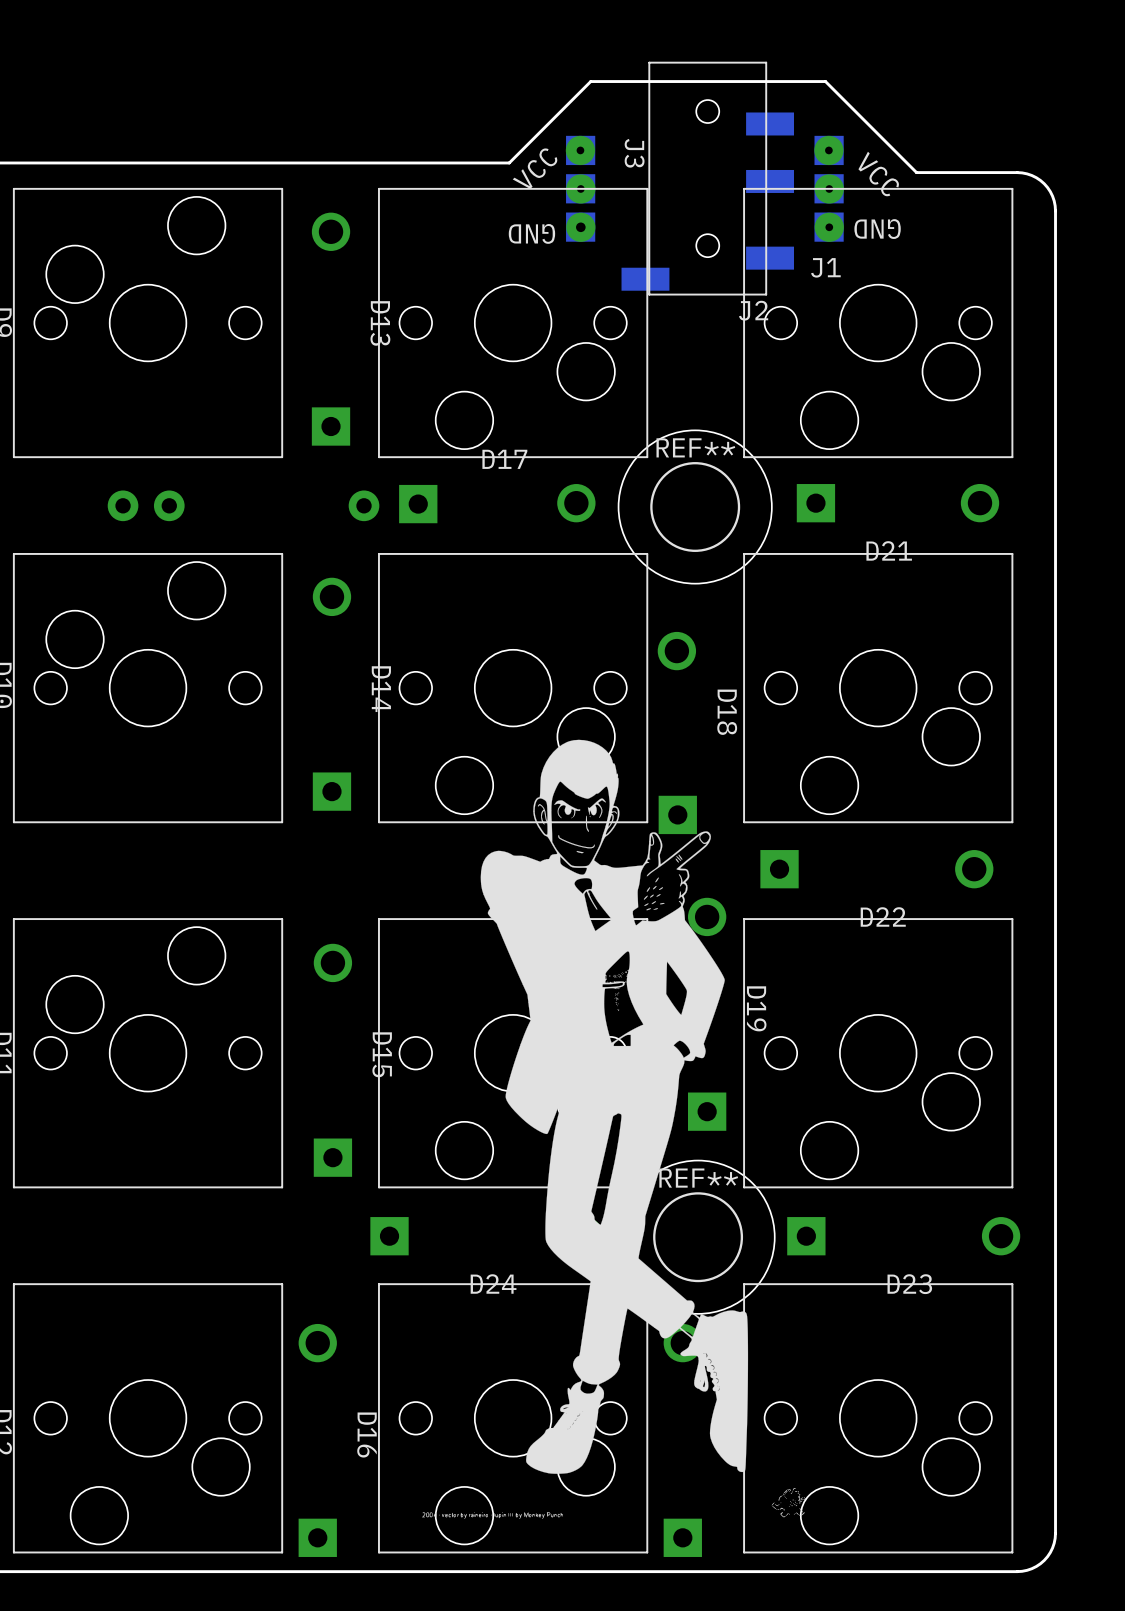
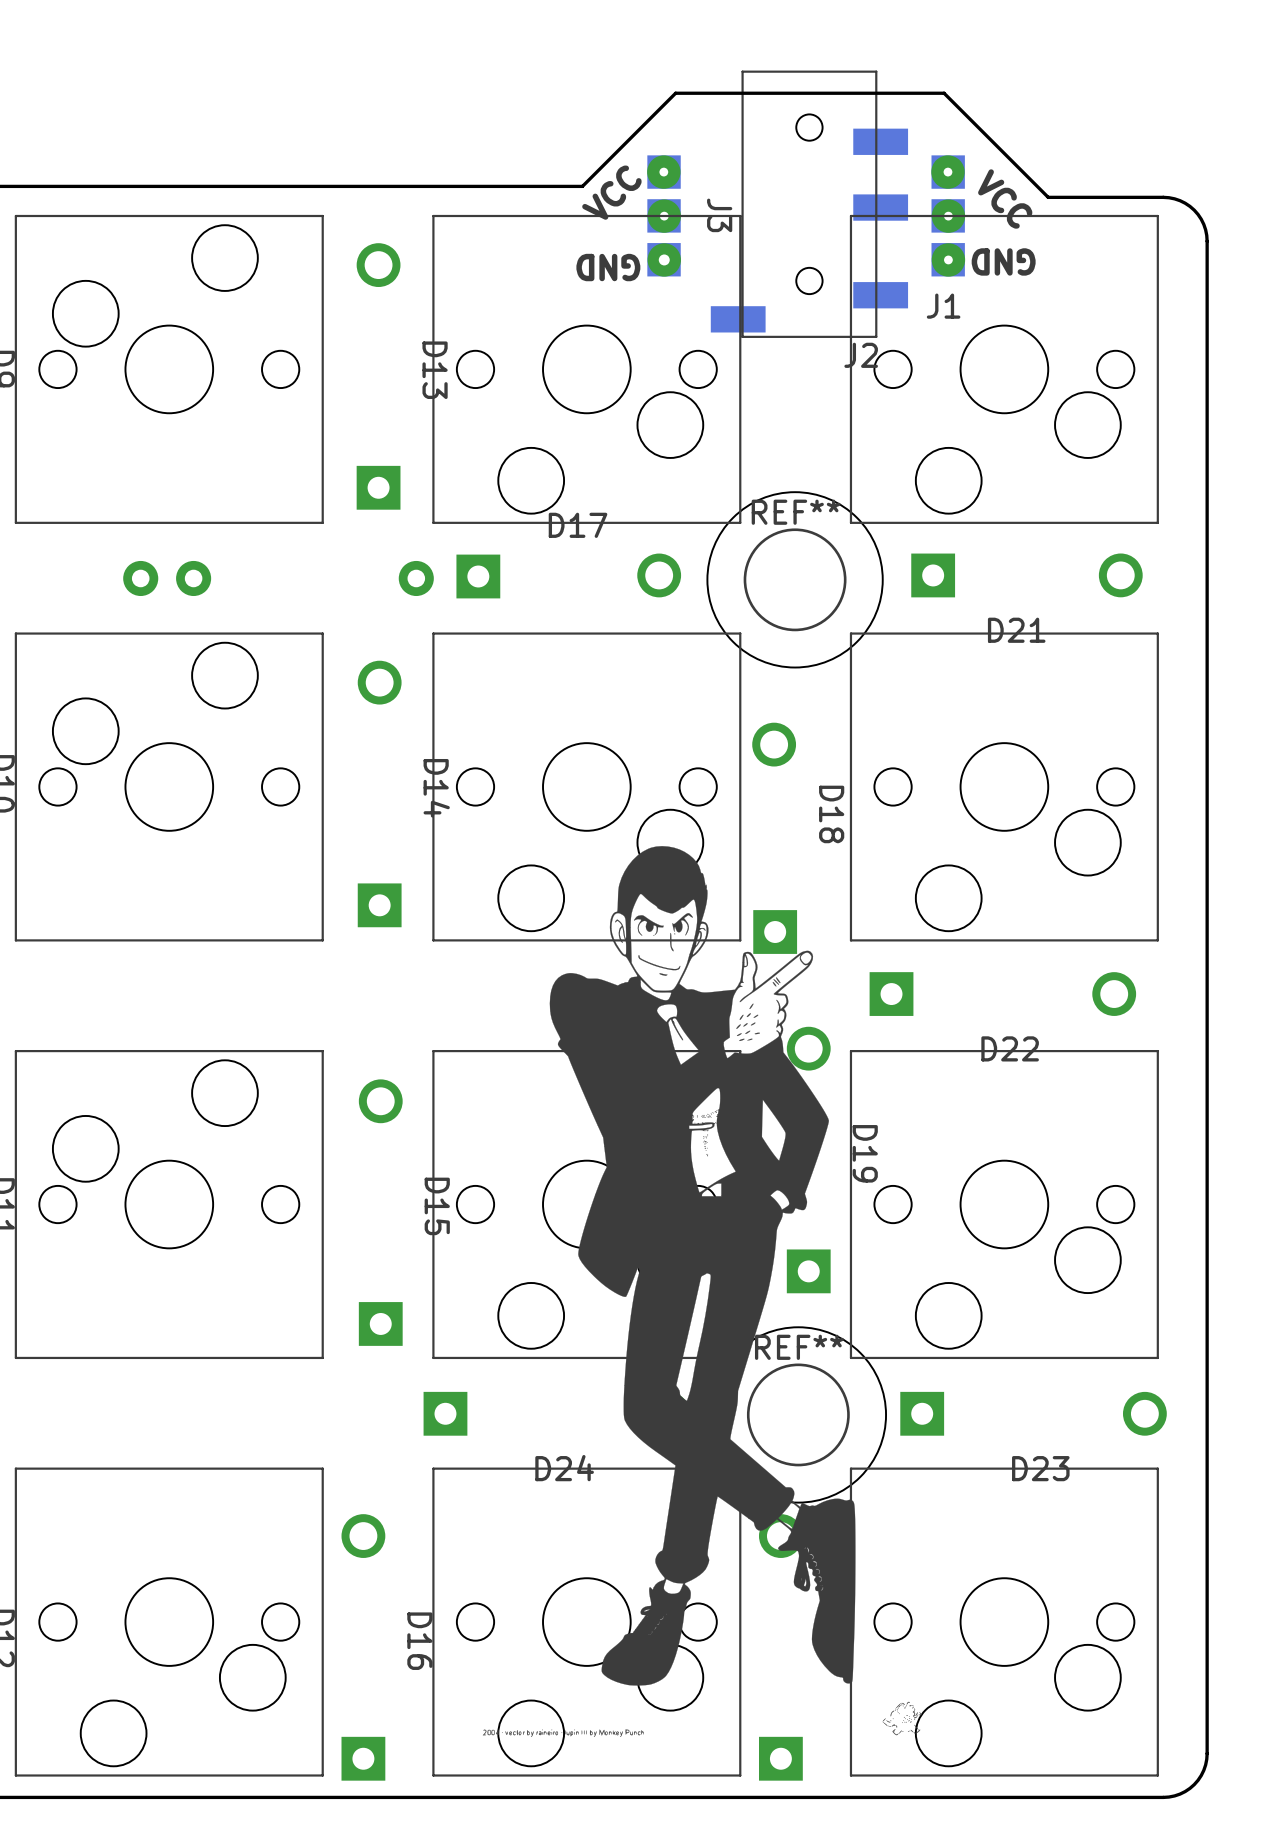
J3 name position: J3 (634, 153) -> J3 (719, 215)

